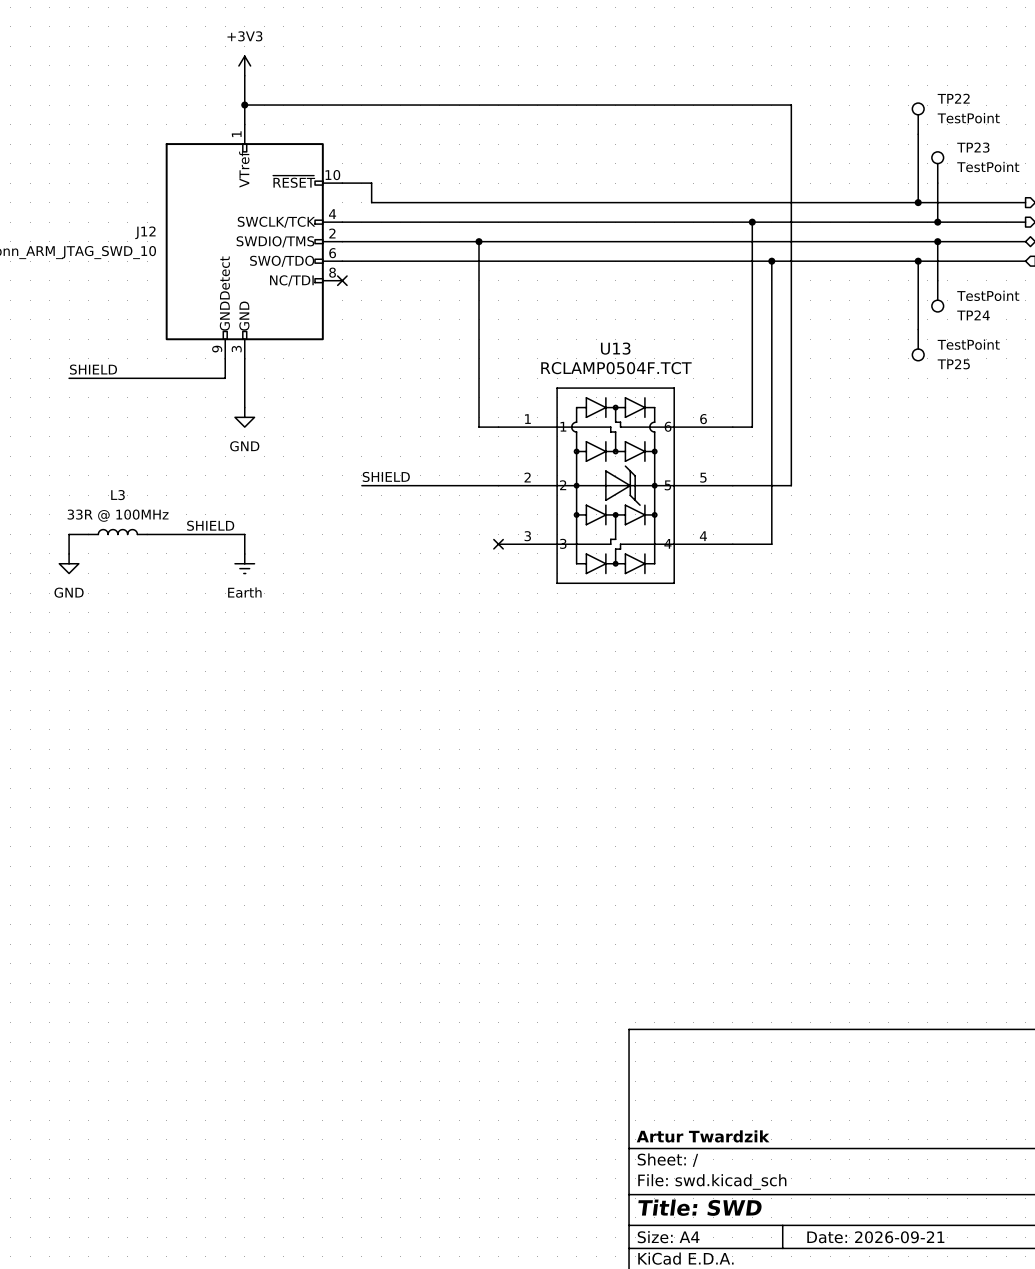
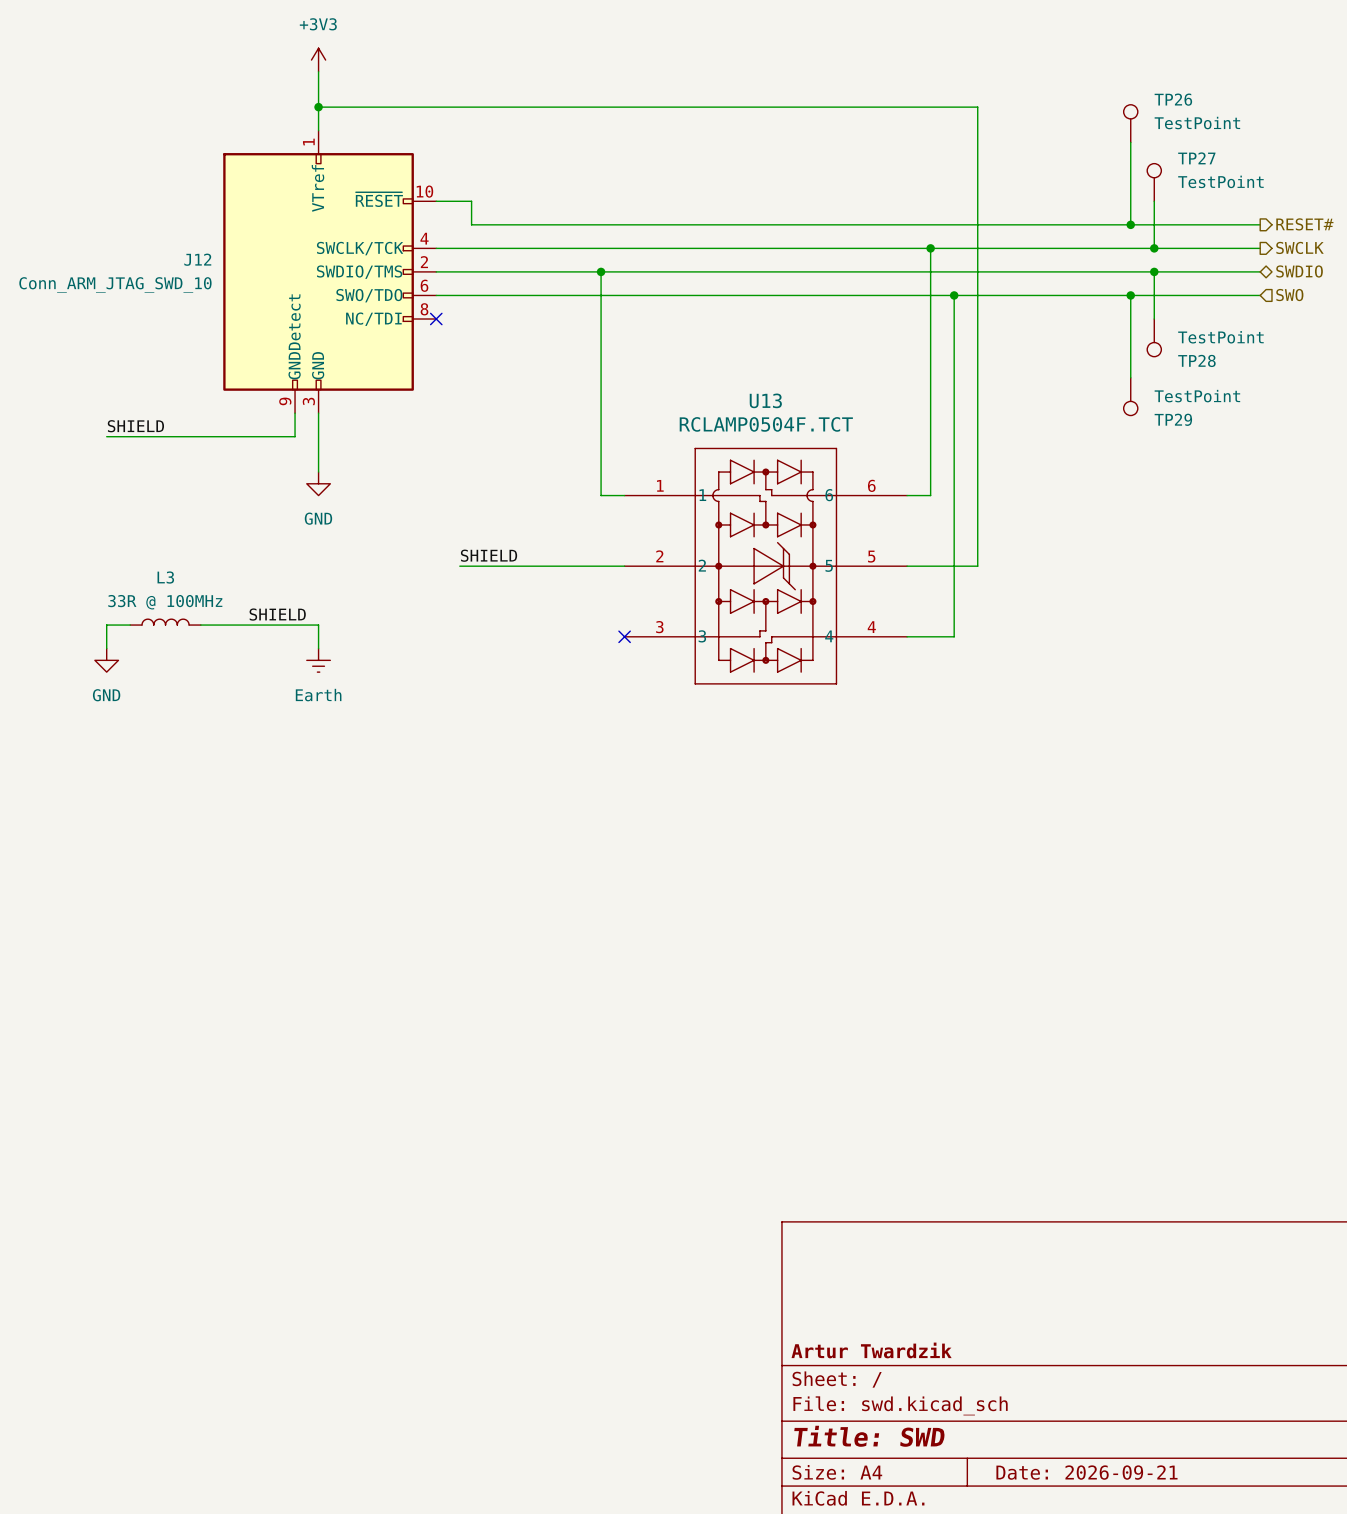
TP22 name: TP22 (953, 98) -> TP26 (1173, 99)
TP23 name: TP23 (973, 147) -> TP27 (1196, 158)
TP24 name: TP24 (973, 315) -> TP28 (1196, 360)
TP25 name: TP25 (953, 364) -> TP29 (1173, 419)

